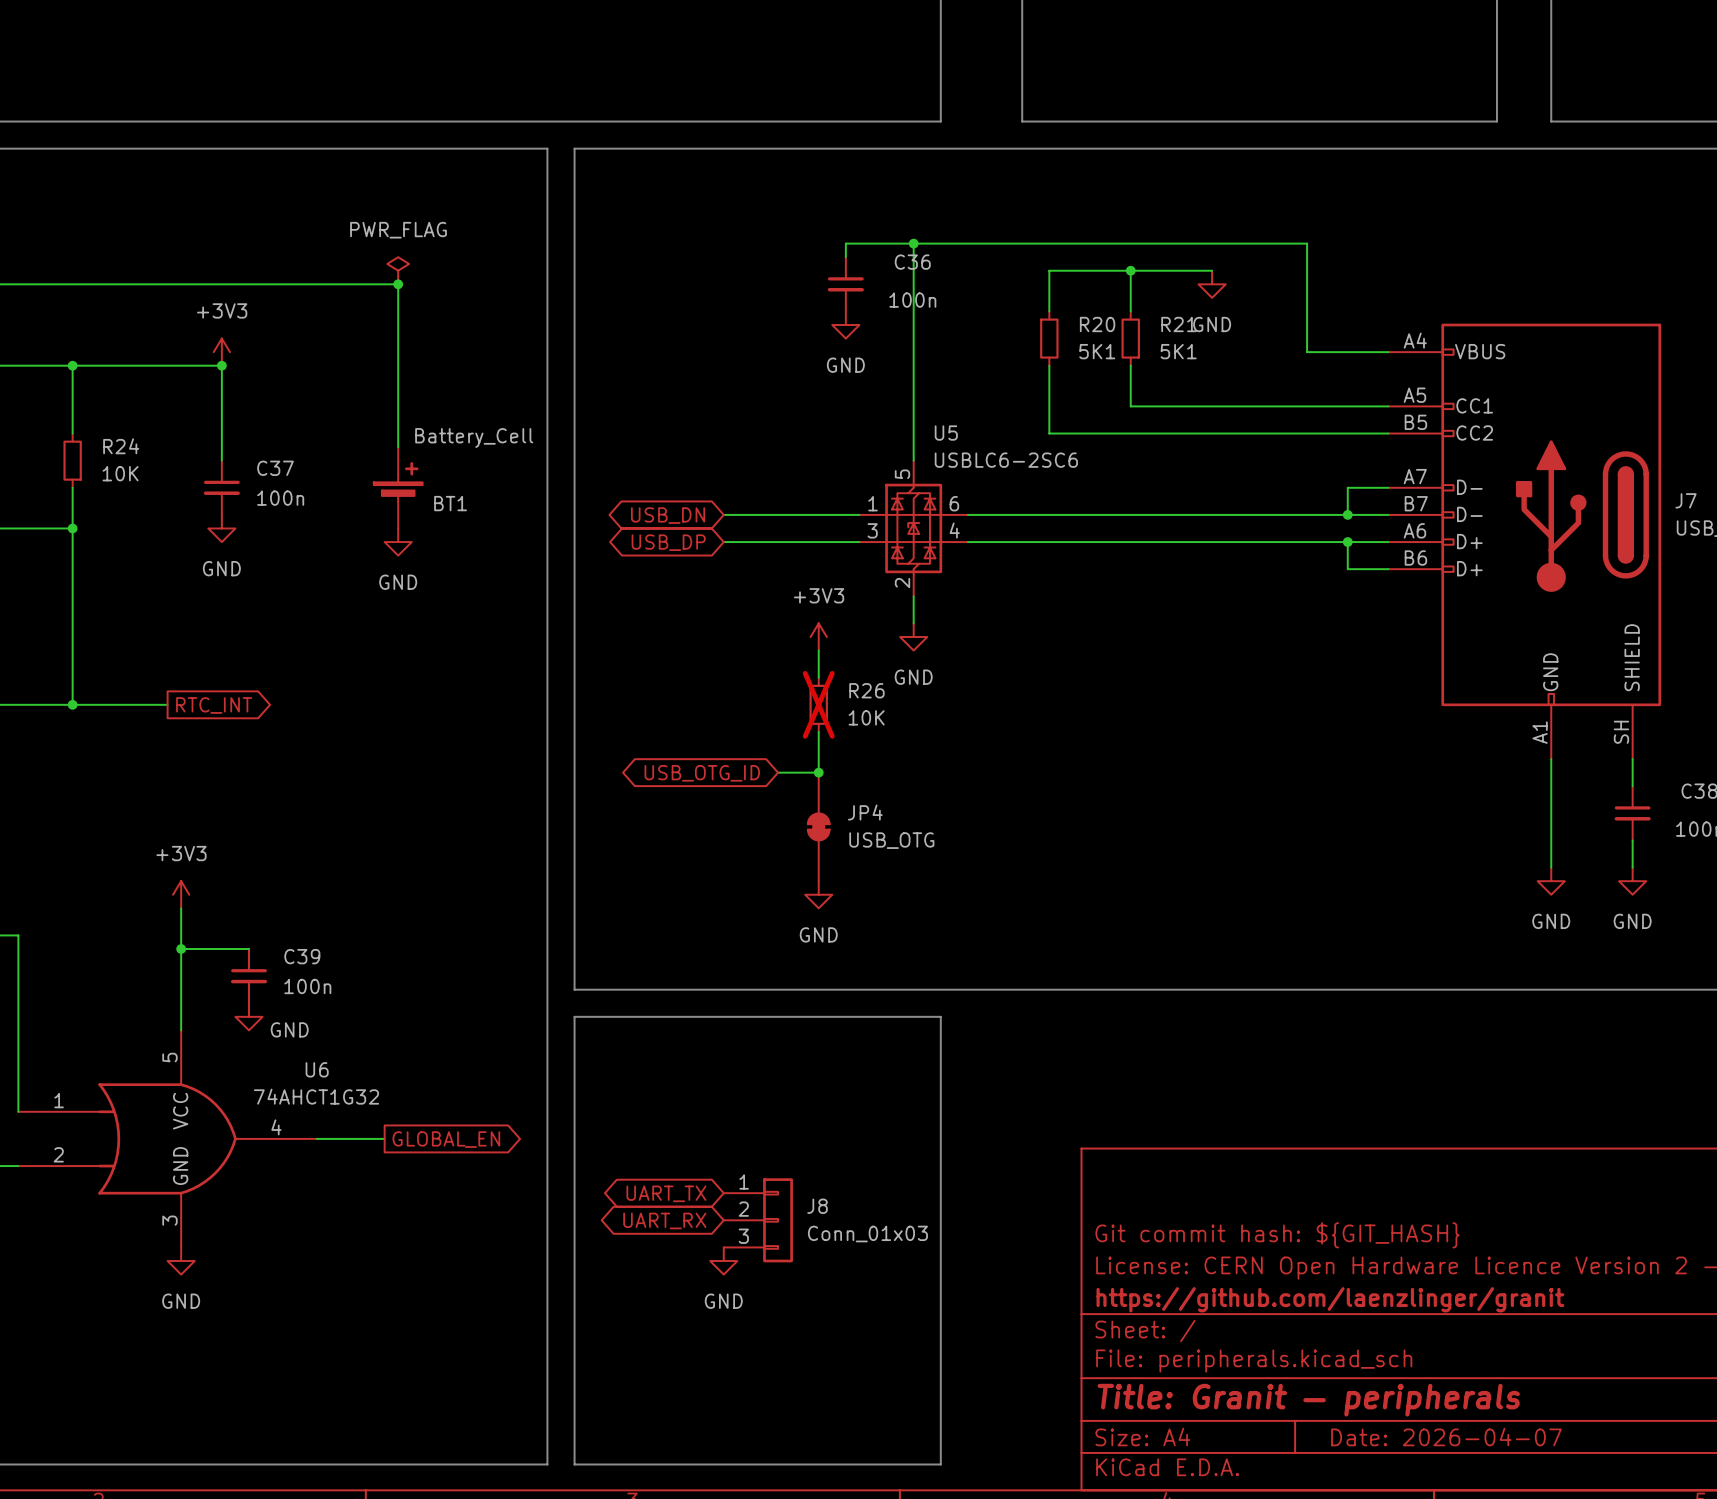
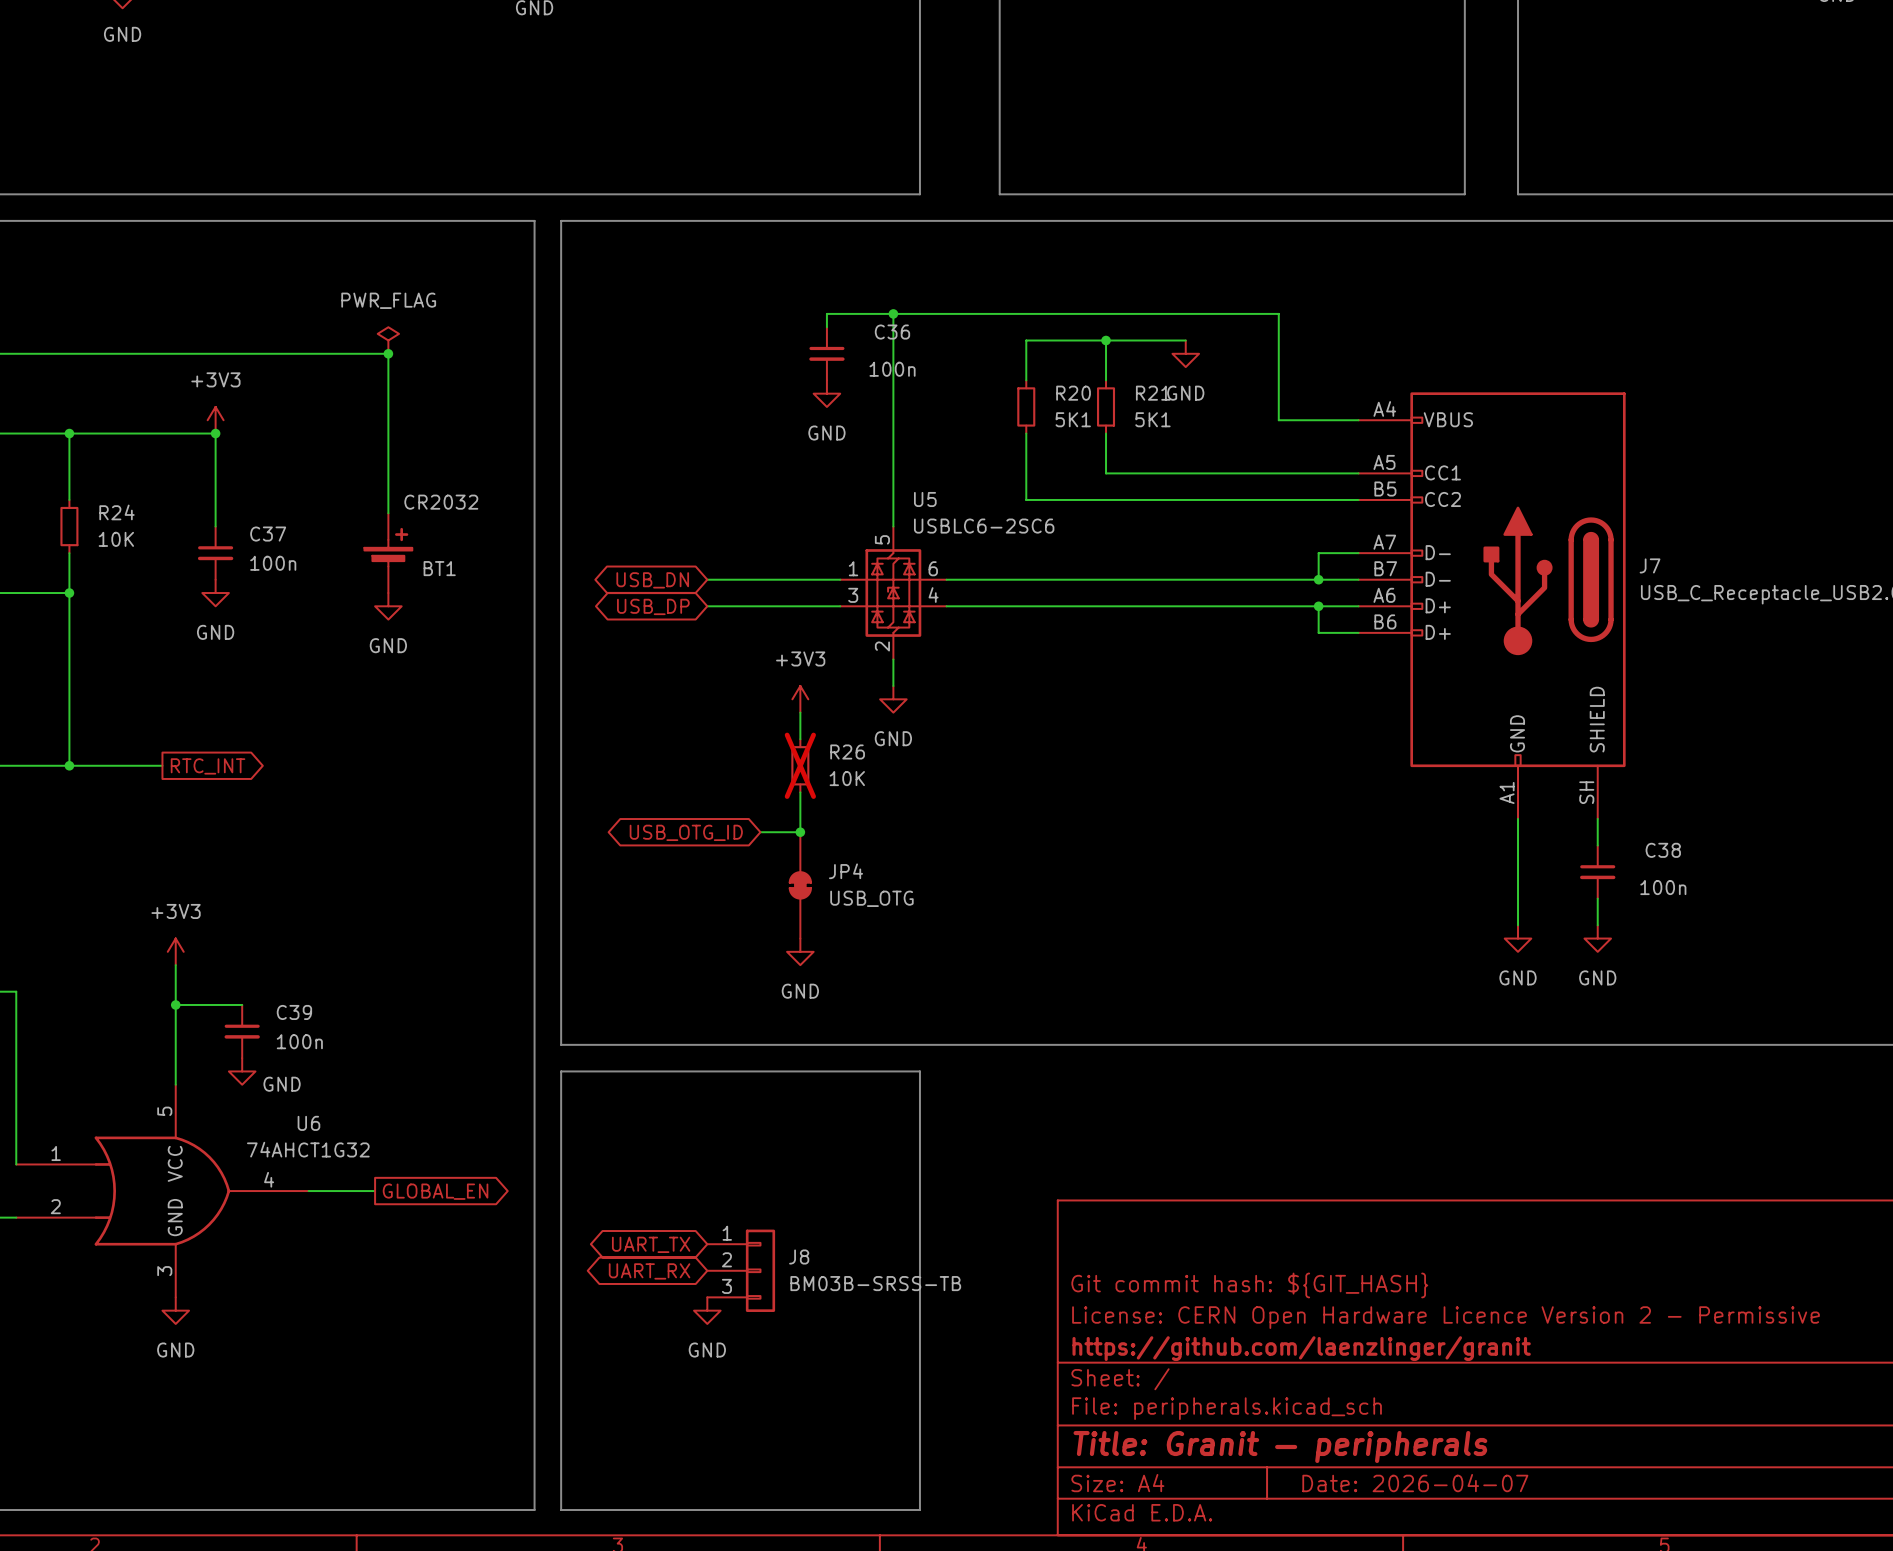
BT1 value: Battery_Cell (474, 437) -> CR2032 (441, 502)
J8 value: Conn_01x03 (867, 1234) -> BM03B-SRSS-TB (875, 1283)

